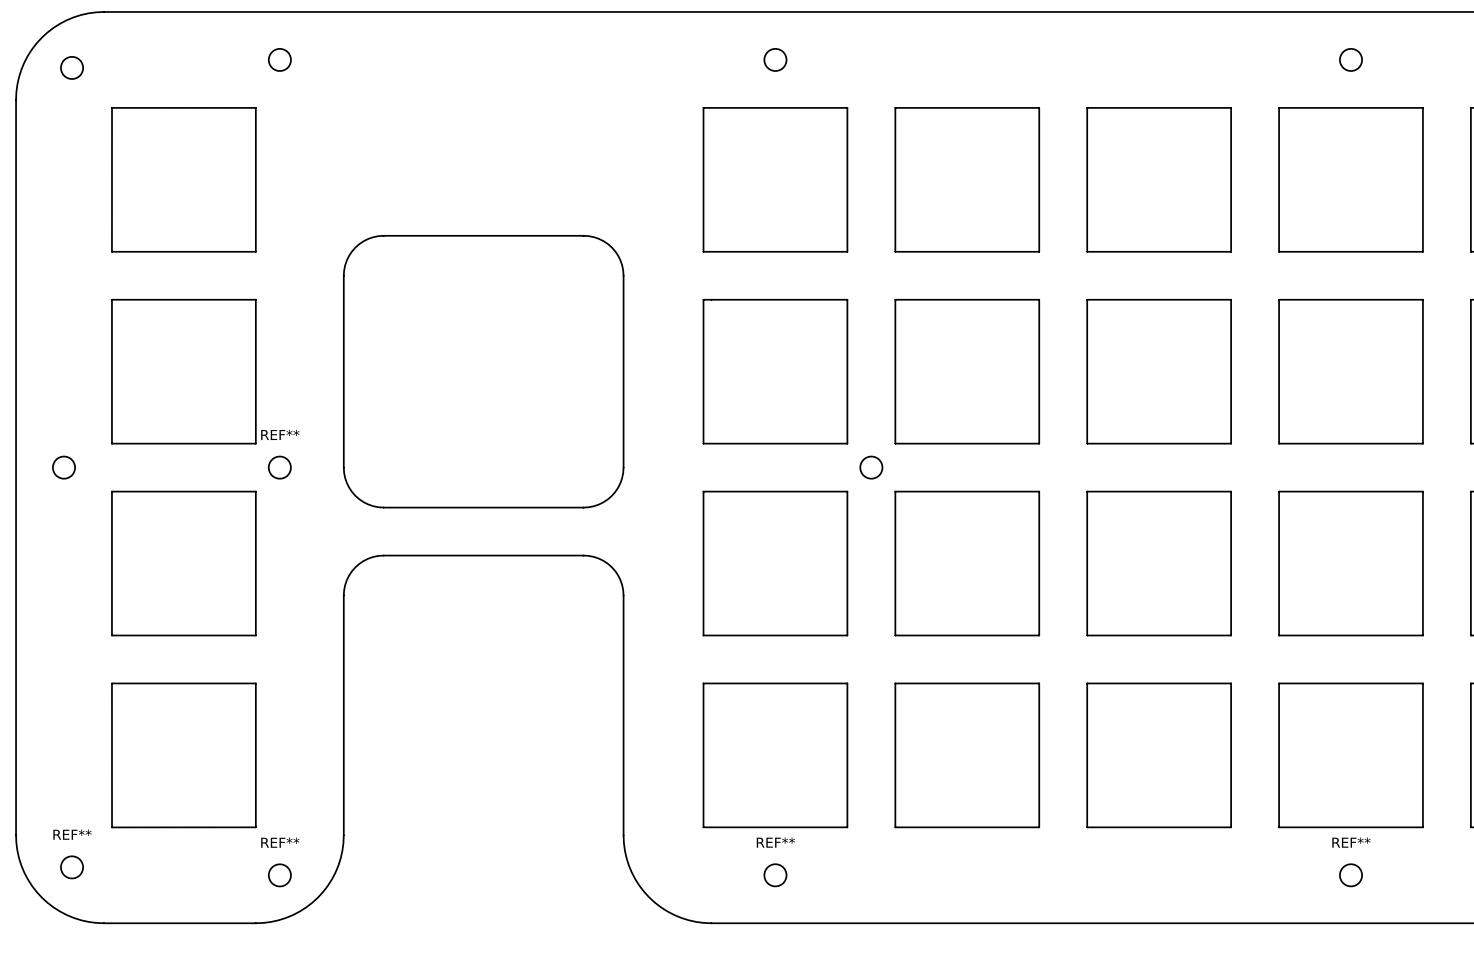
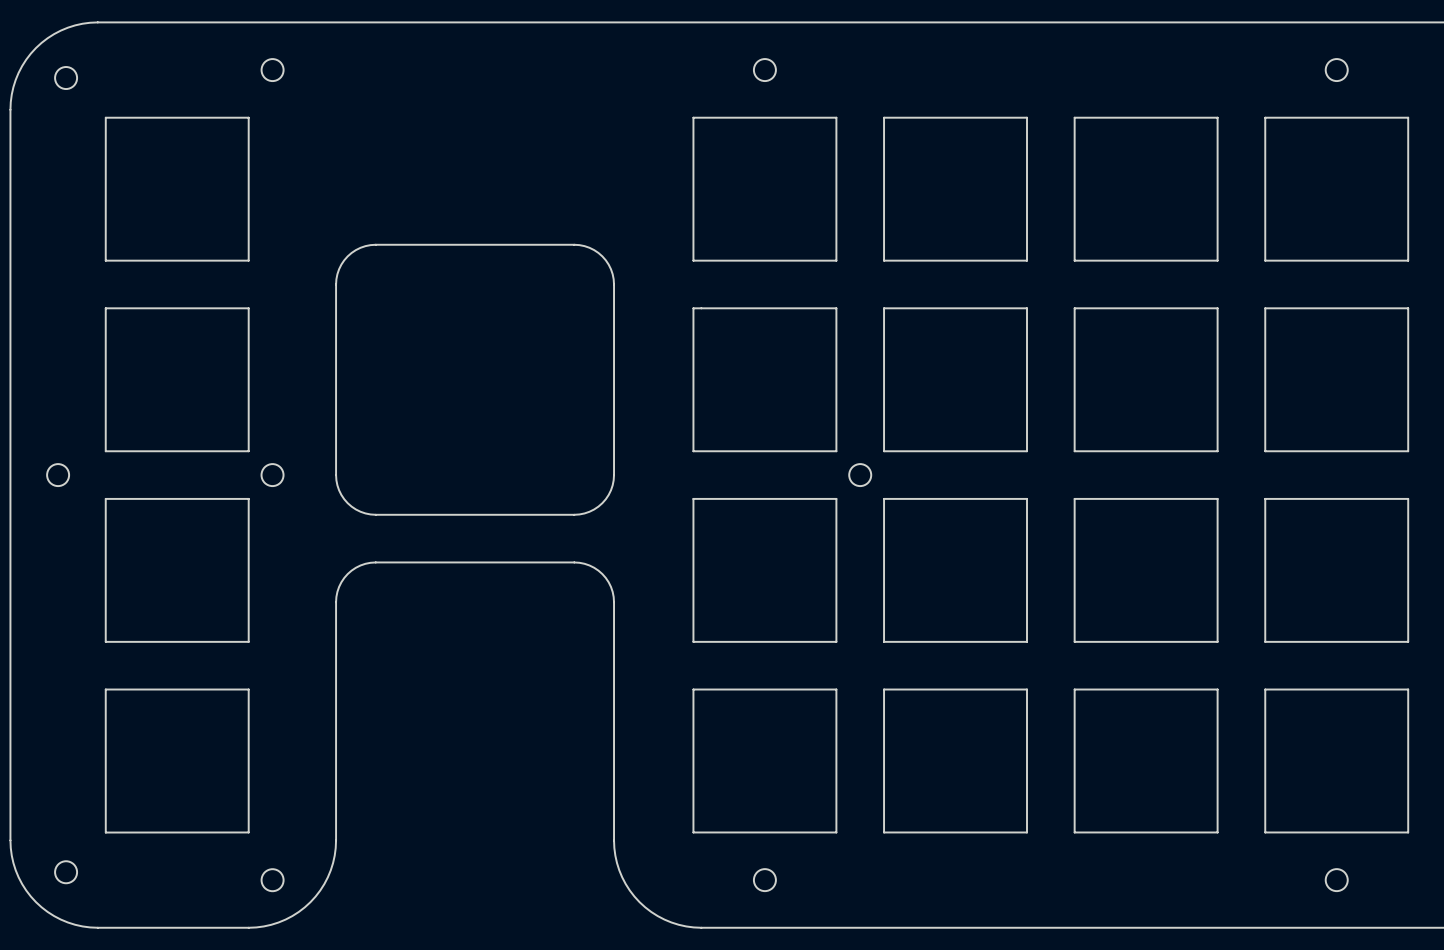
REF** name: REF** (280, 434) -> none
REF** name: REF** (72, 834) -> none
REF** name: REF** (280, 842) -> none
REF** name: REF** (775, 842) -> none
REF** name: REF** (1351, 842) -> none

